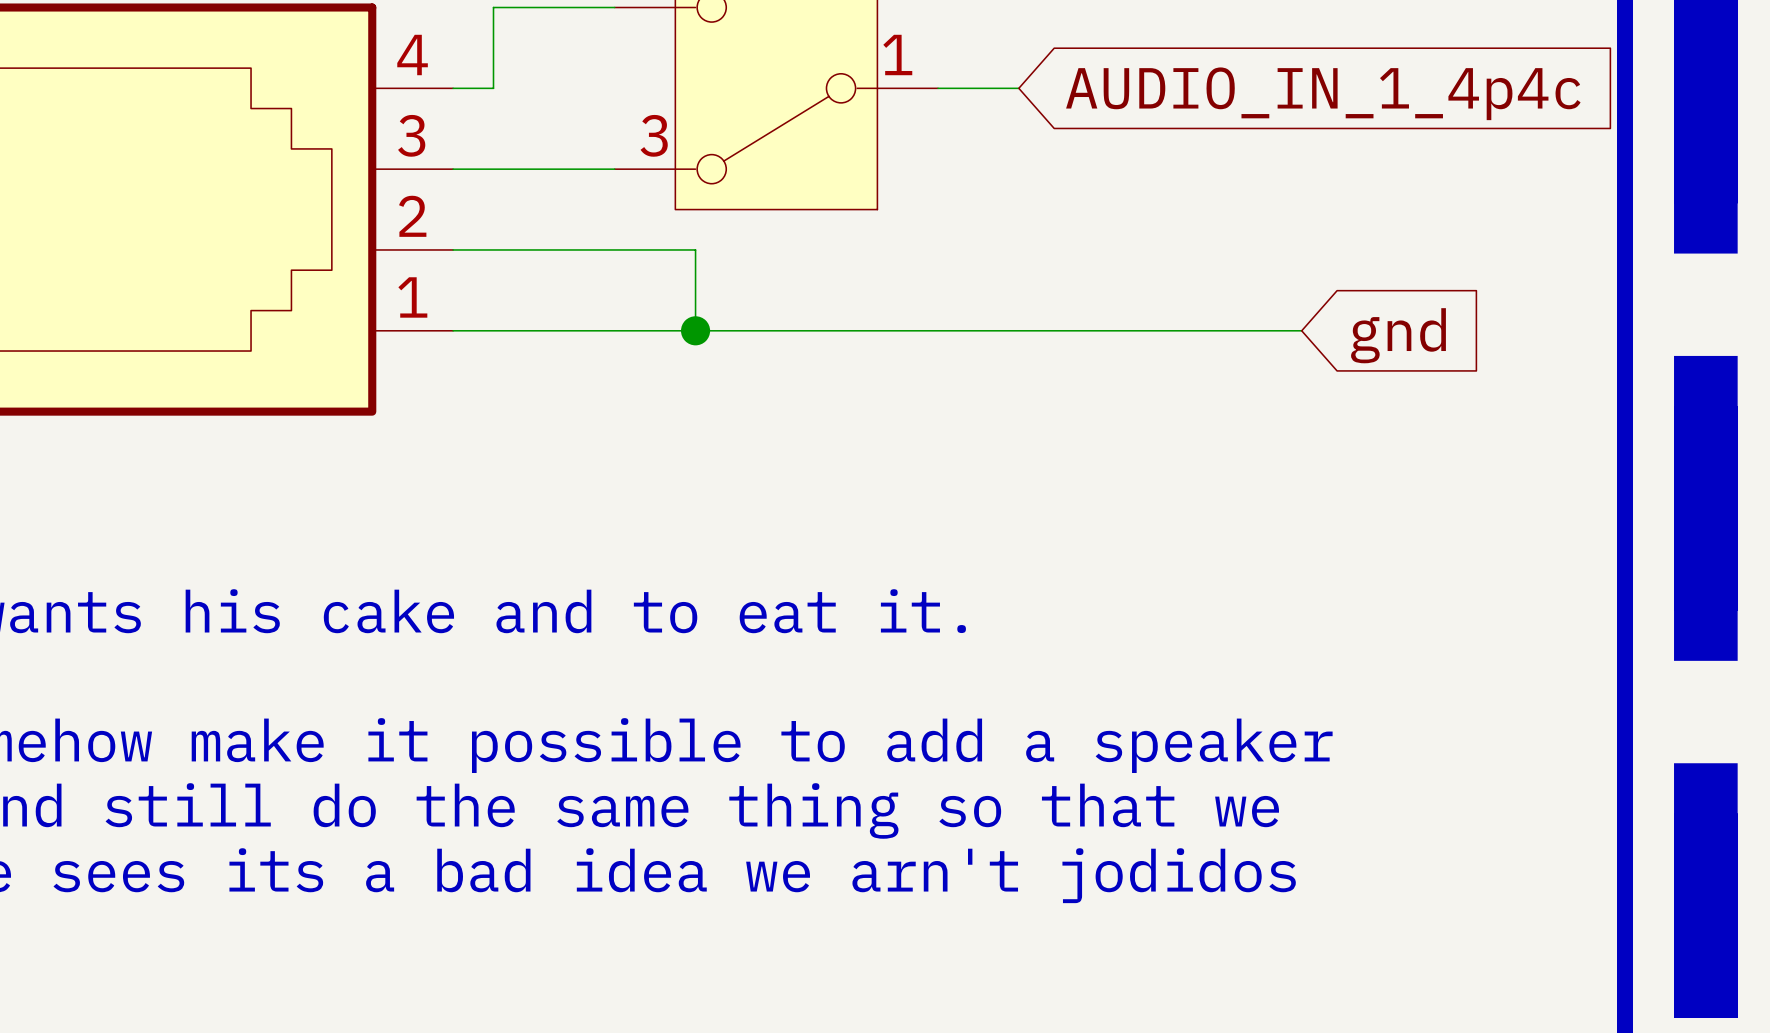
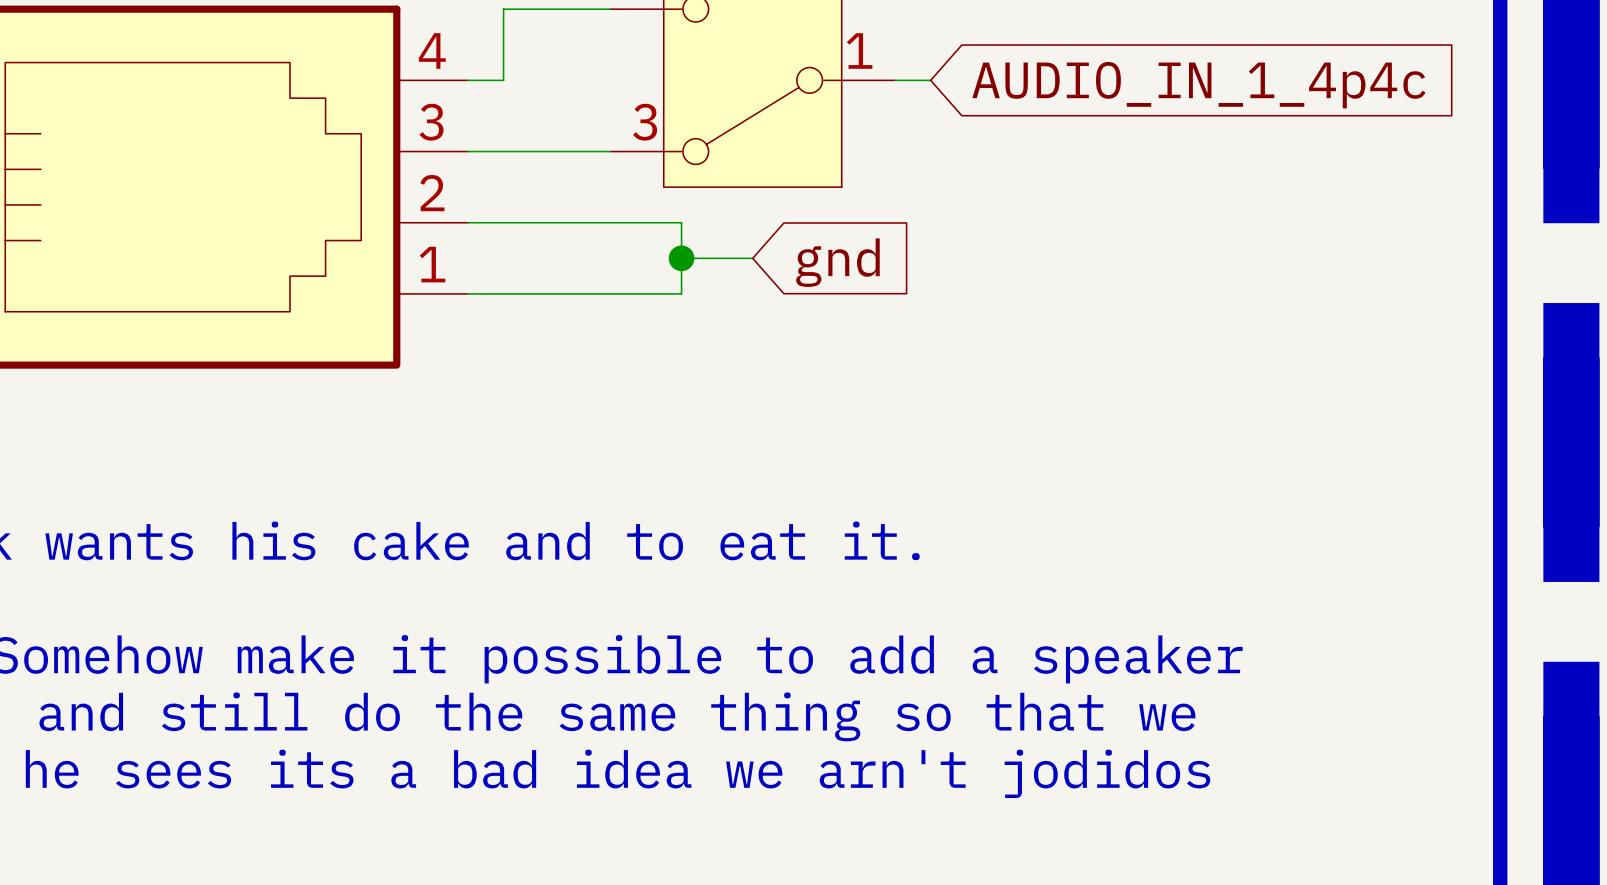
wire: (978, 88) (1018, 88) -> none
global label position: AUDIO_IN_1_4p4c (1323, 93) -> AUDIO_IN_1_4p4c (1198, 85)
wire: none -> (681, 258) (752, 258)
wire: (695, 330) (1301, 330) -> none
junction position: (695, 330) -> (681, 258)
global label position: gnd (1398, 335) -> gnd (837, 262)

